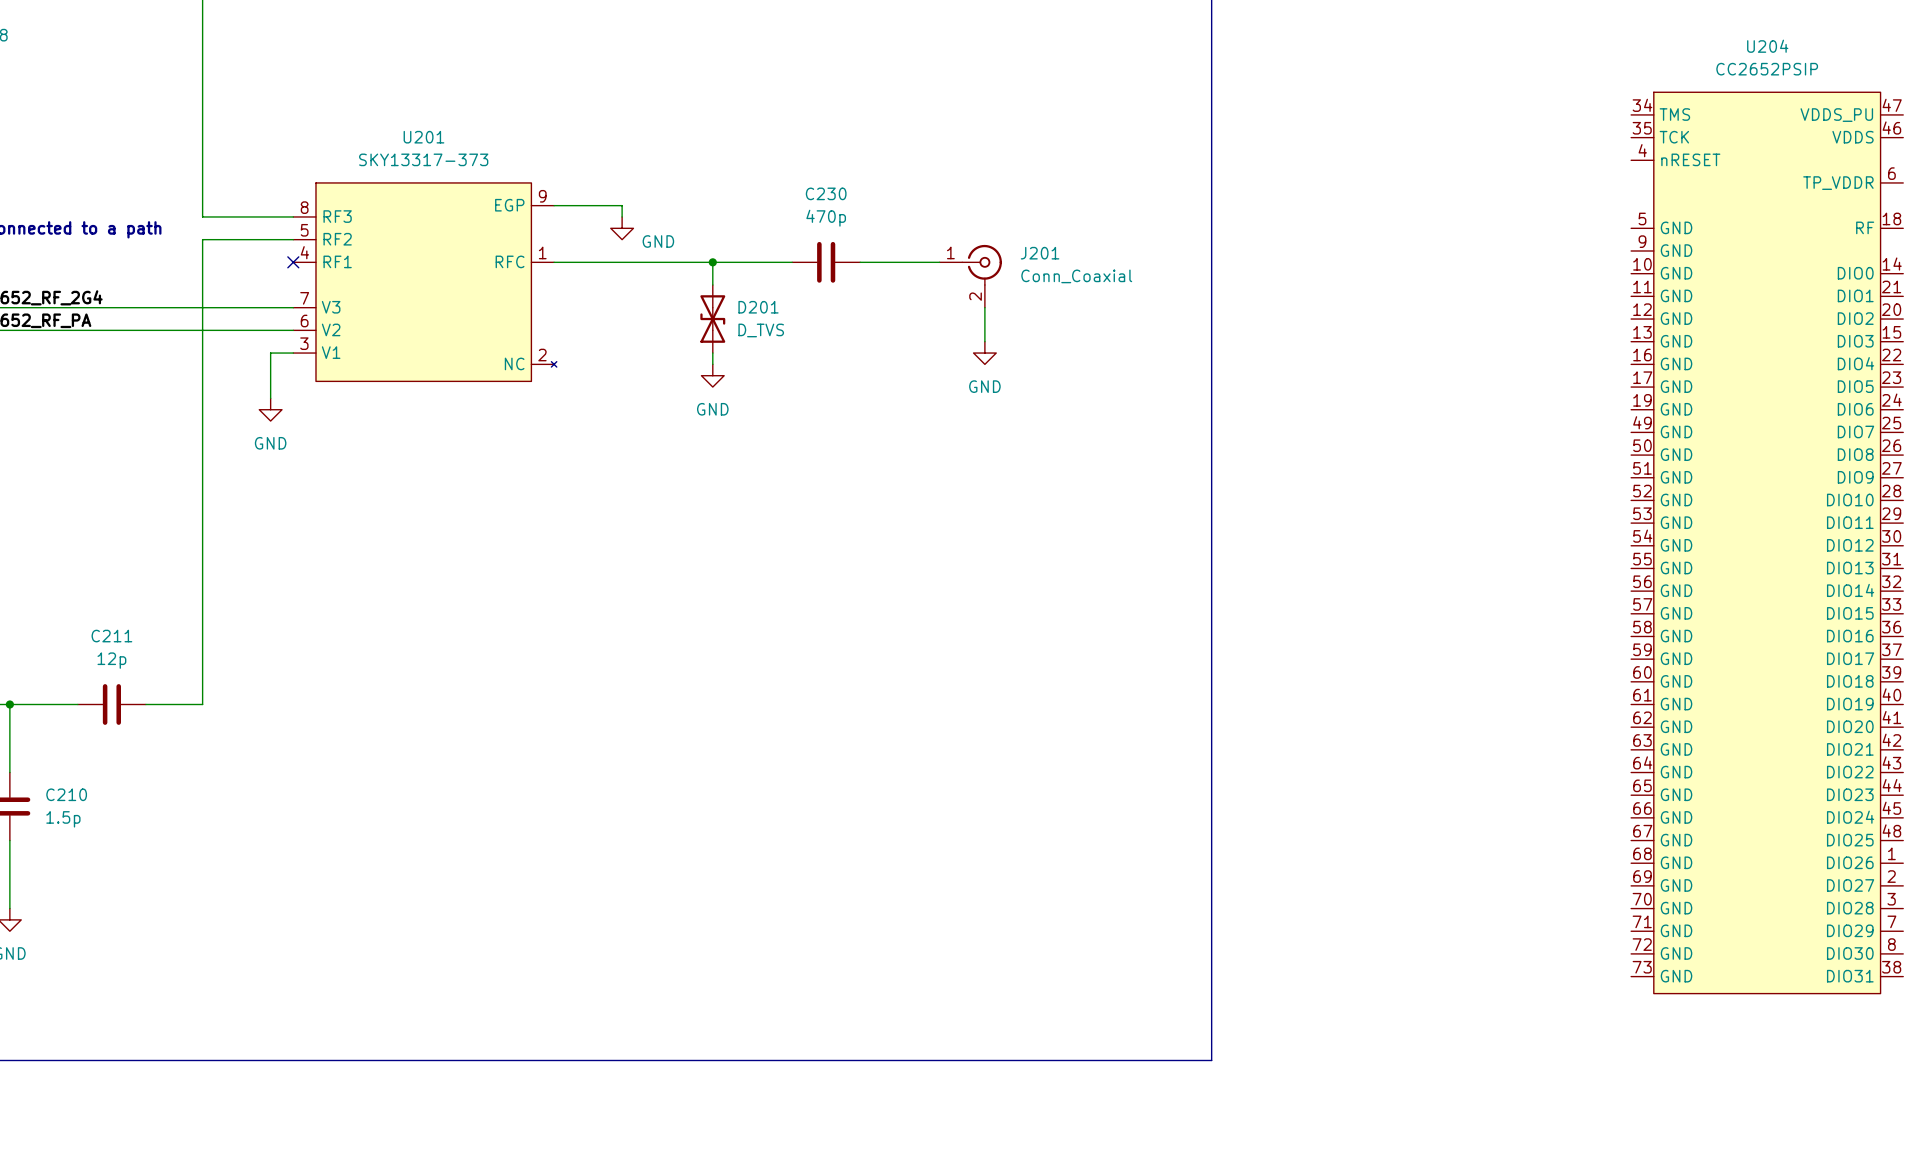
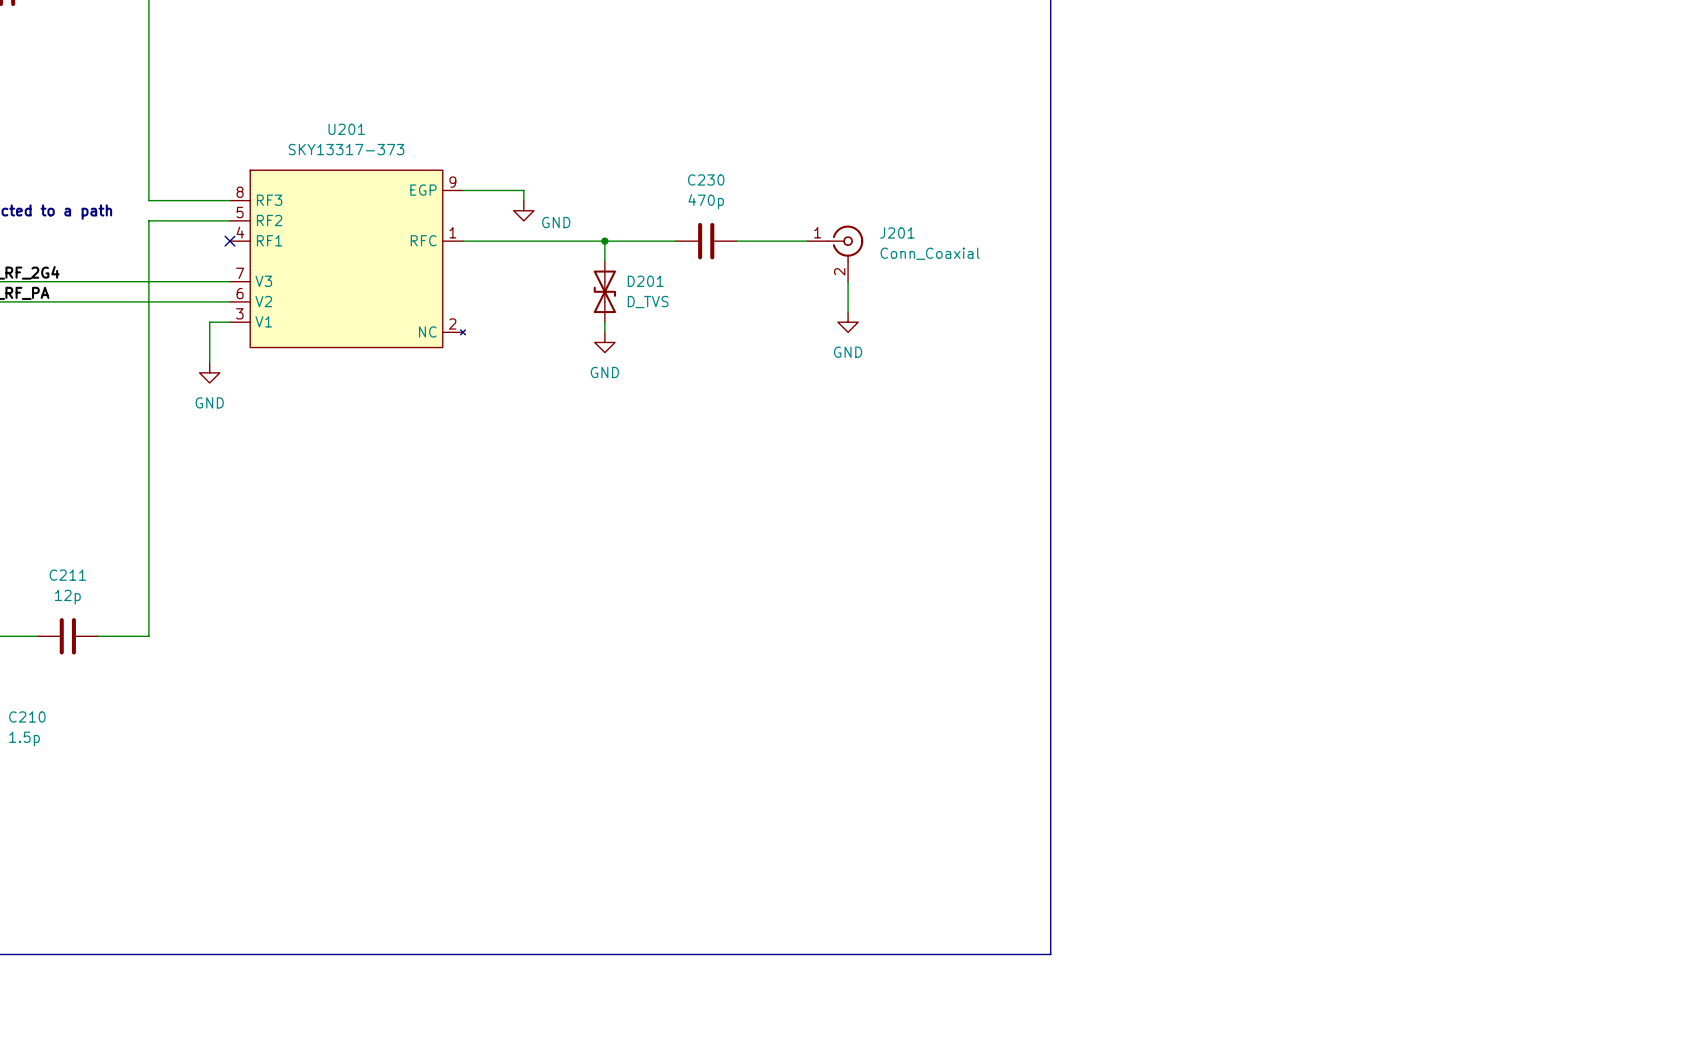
U204: CC2652PSIP (1767, 542) -> none

